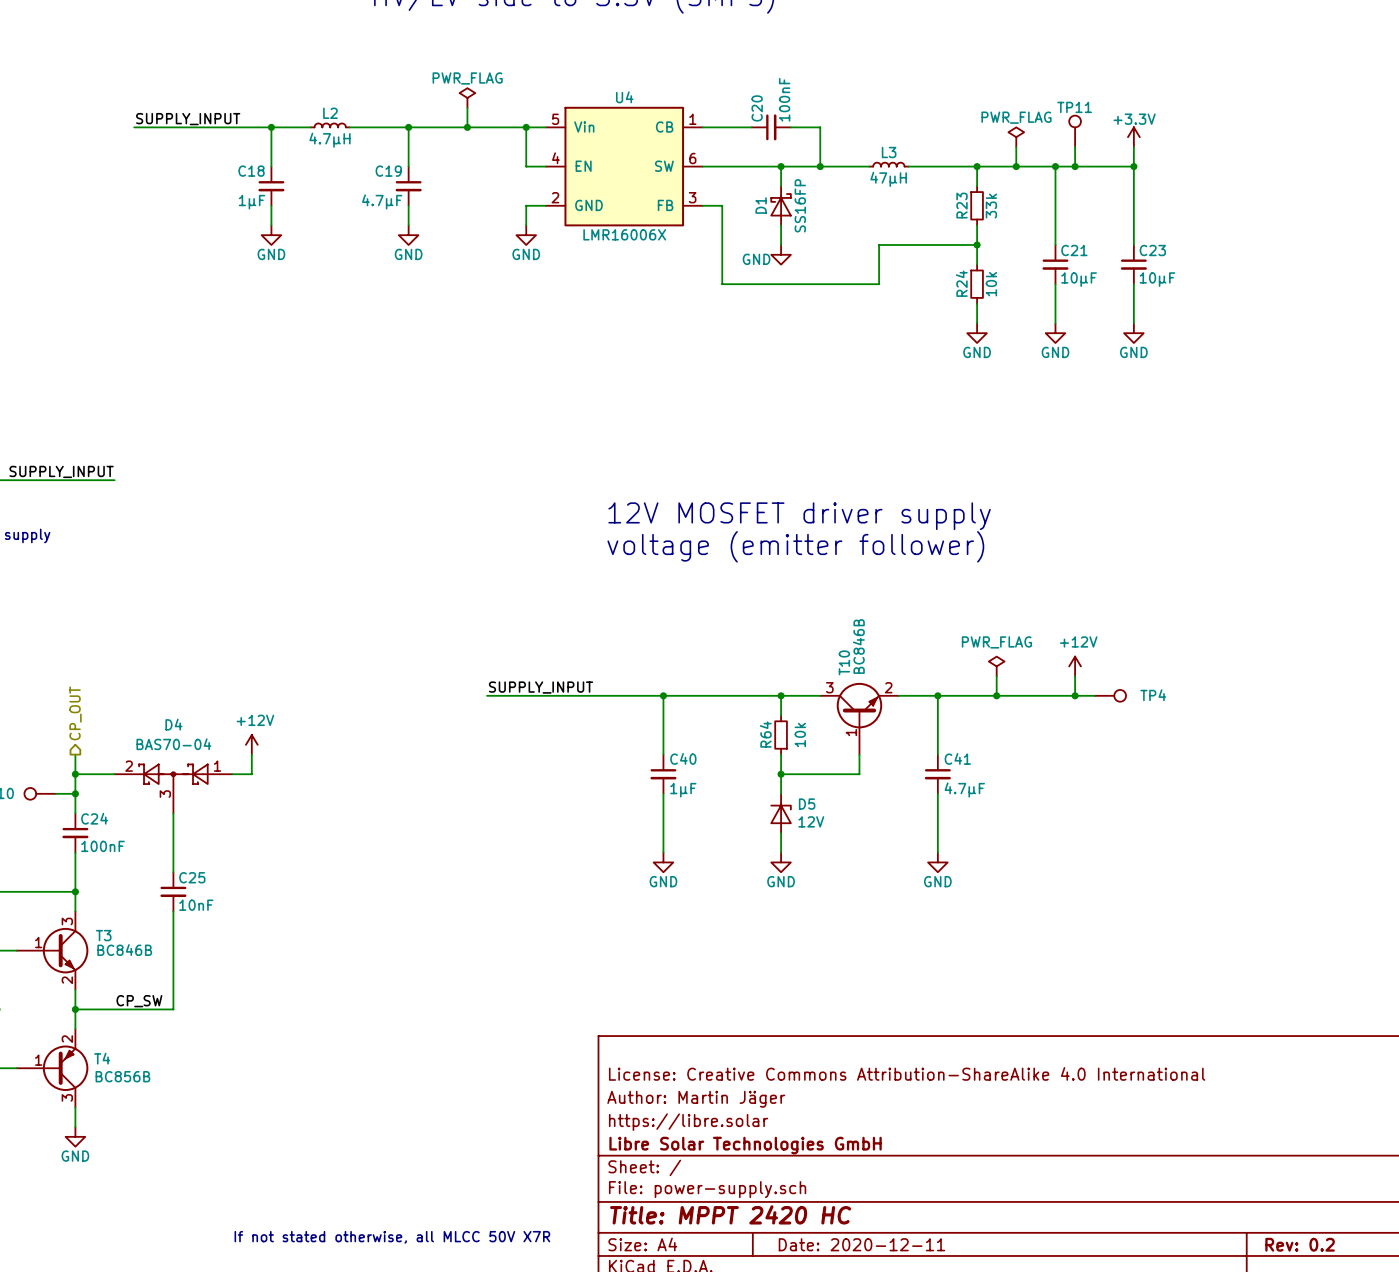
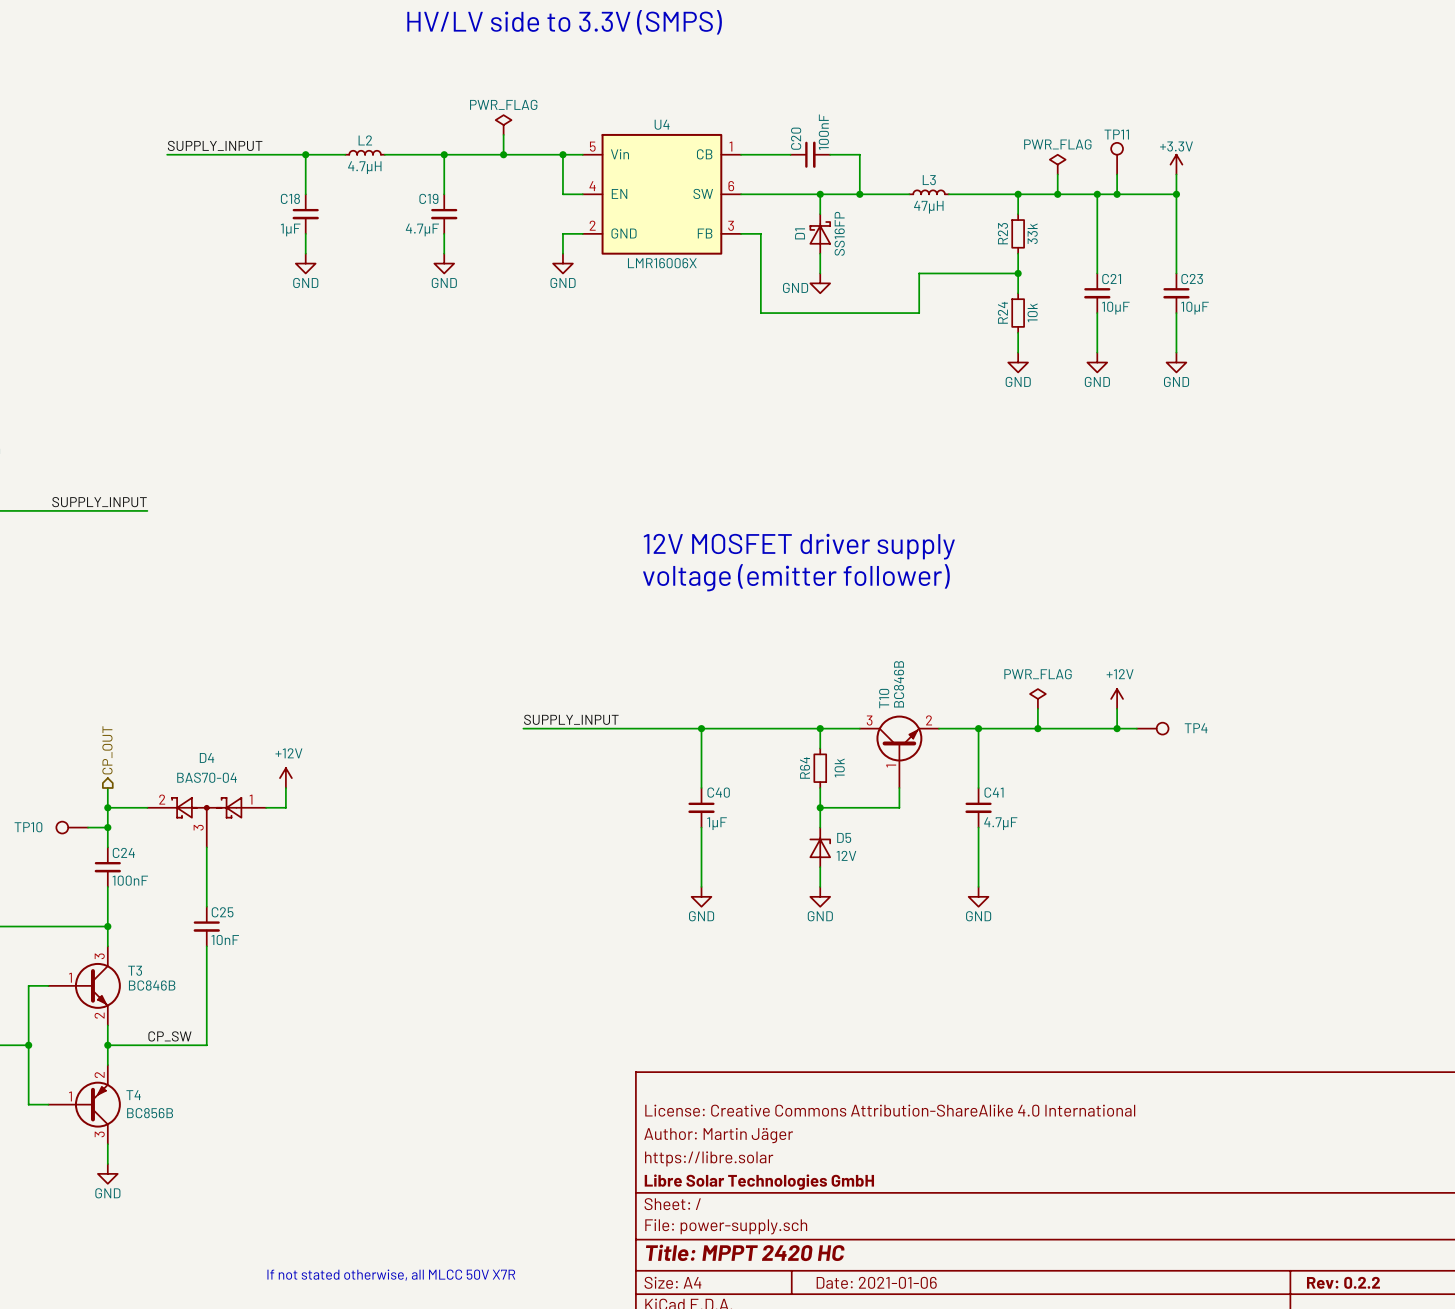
title block: Date: 2020-12-11 (861, 1244) -> Date: 2021-01-06 (876, 1282)
title block: Rev: 0.2 (1300, 1244) -> Rev: 0.2.2 (1343, 1282)

